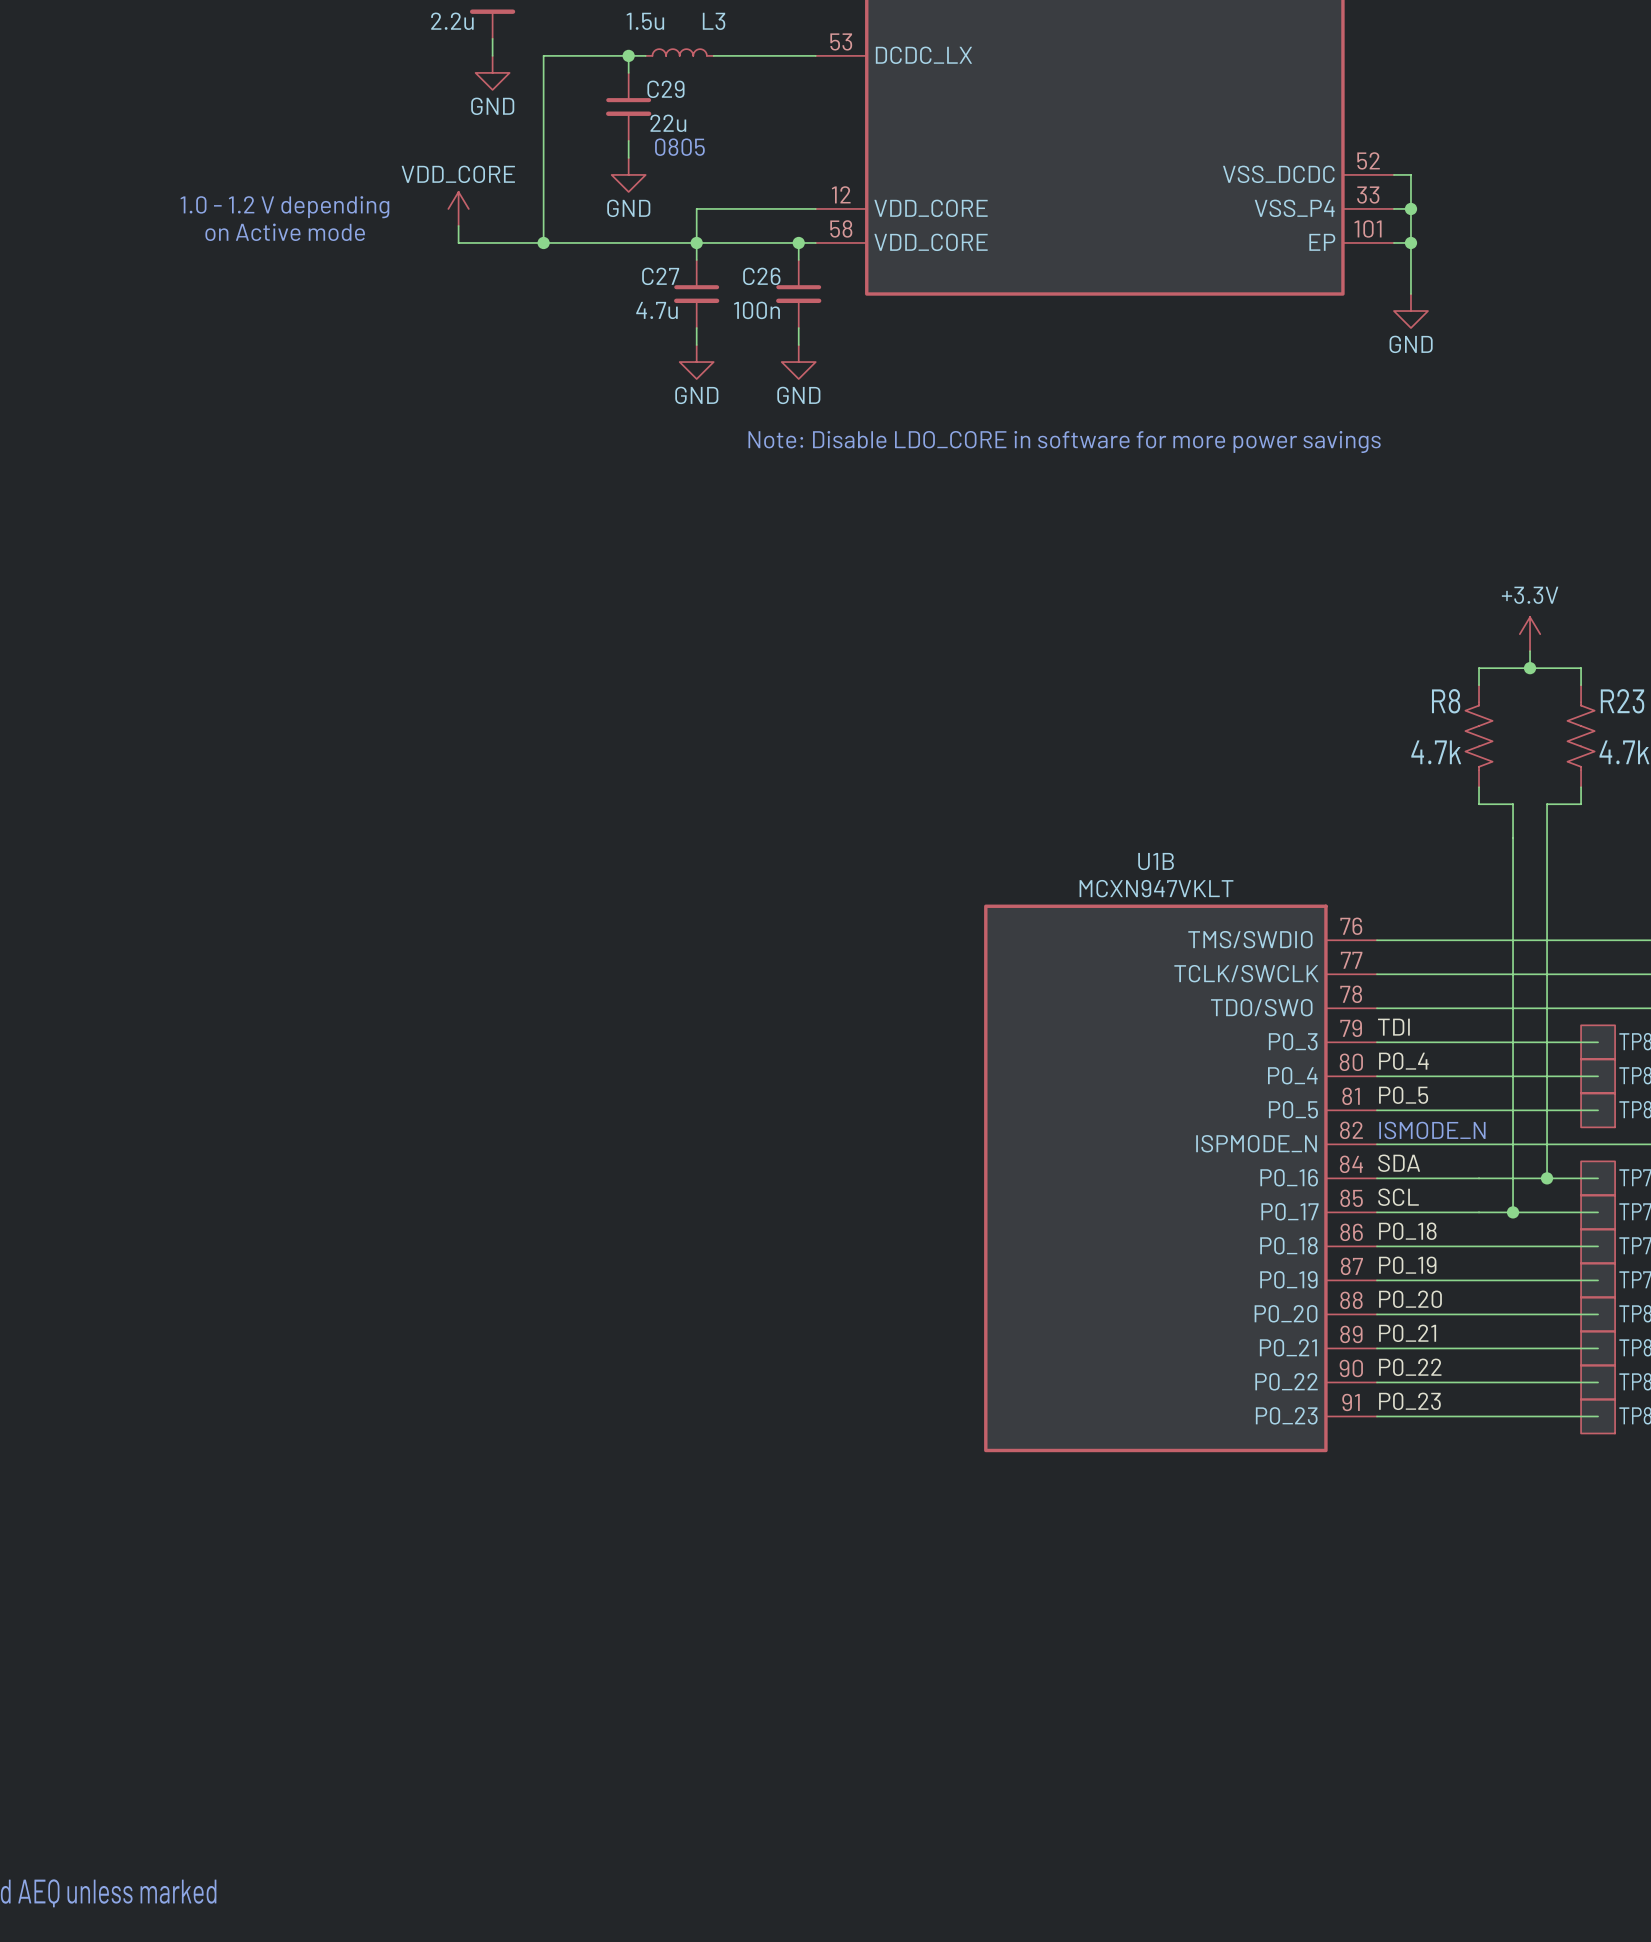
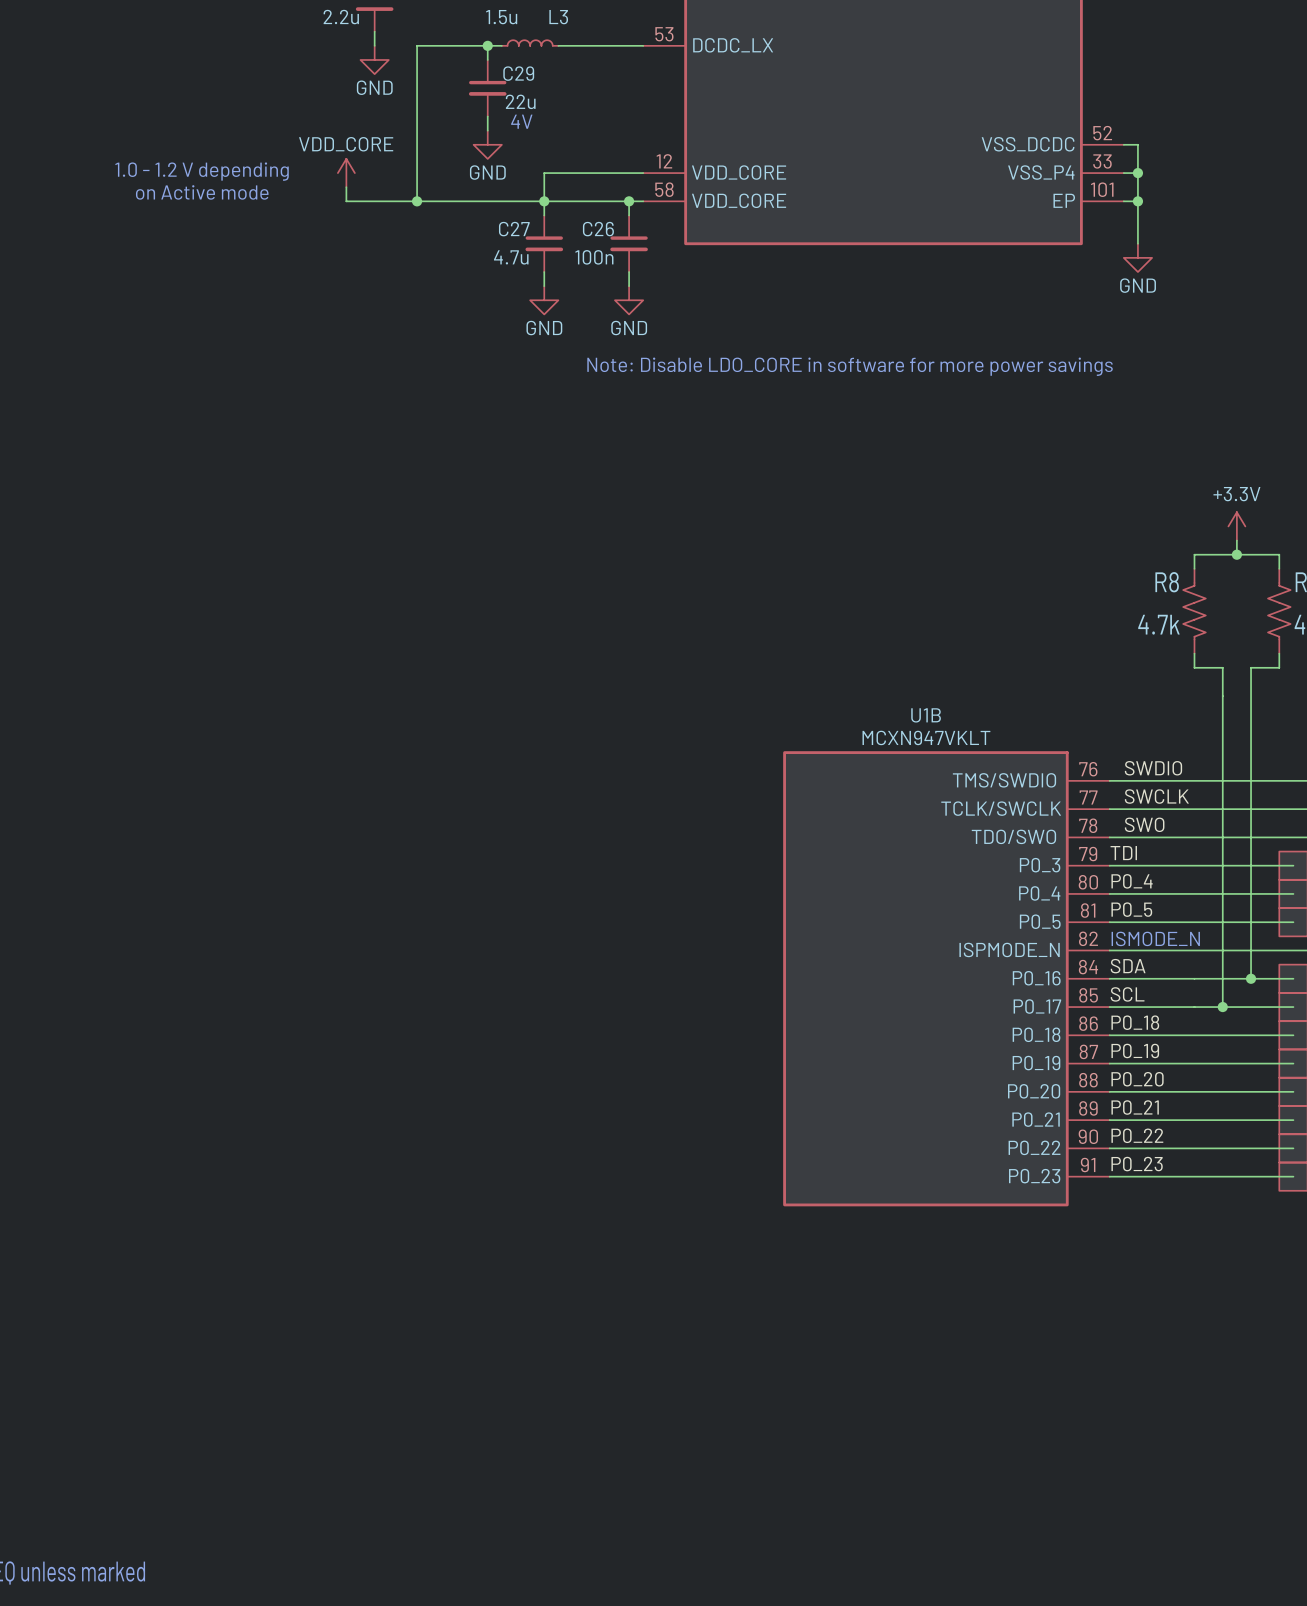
text: 0805 (679, 147) -> 4V (521, 121)
label: none -> SWDIO (1153, 768)
label: none -> SWCLK (1156, 796)
label: none -> SWO (1144, 824)

